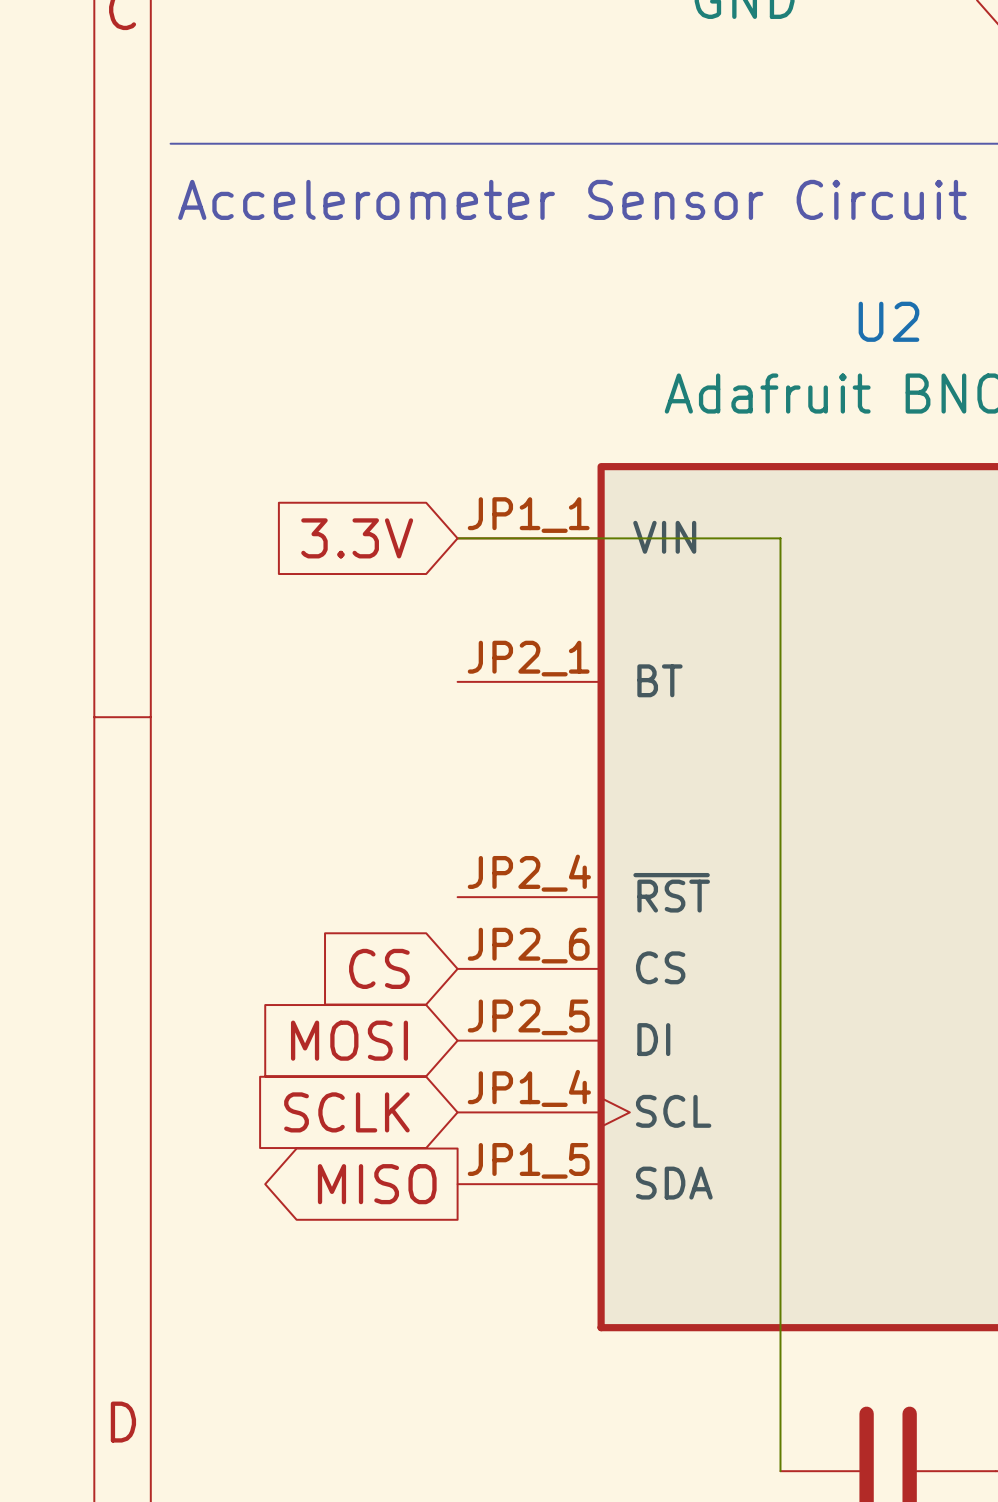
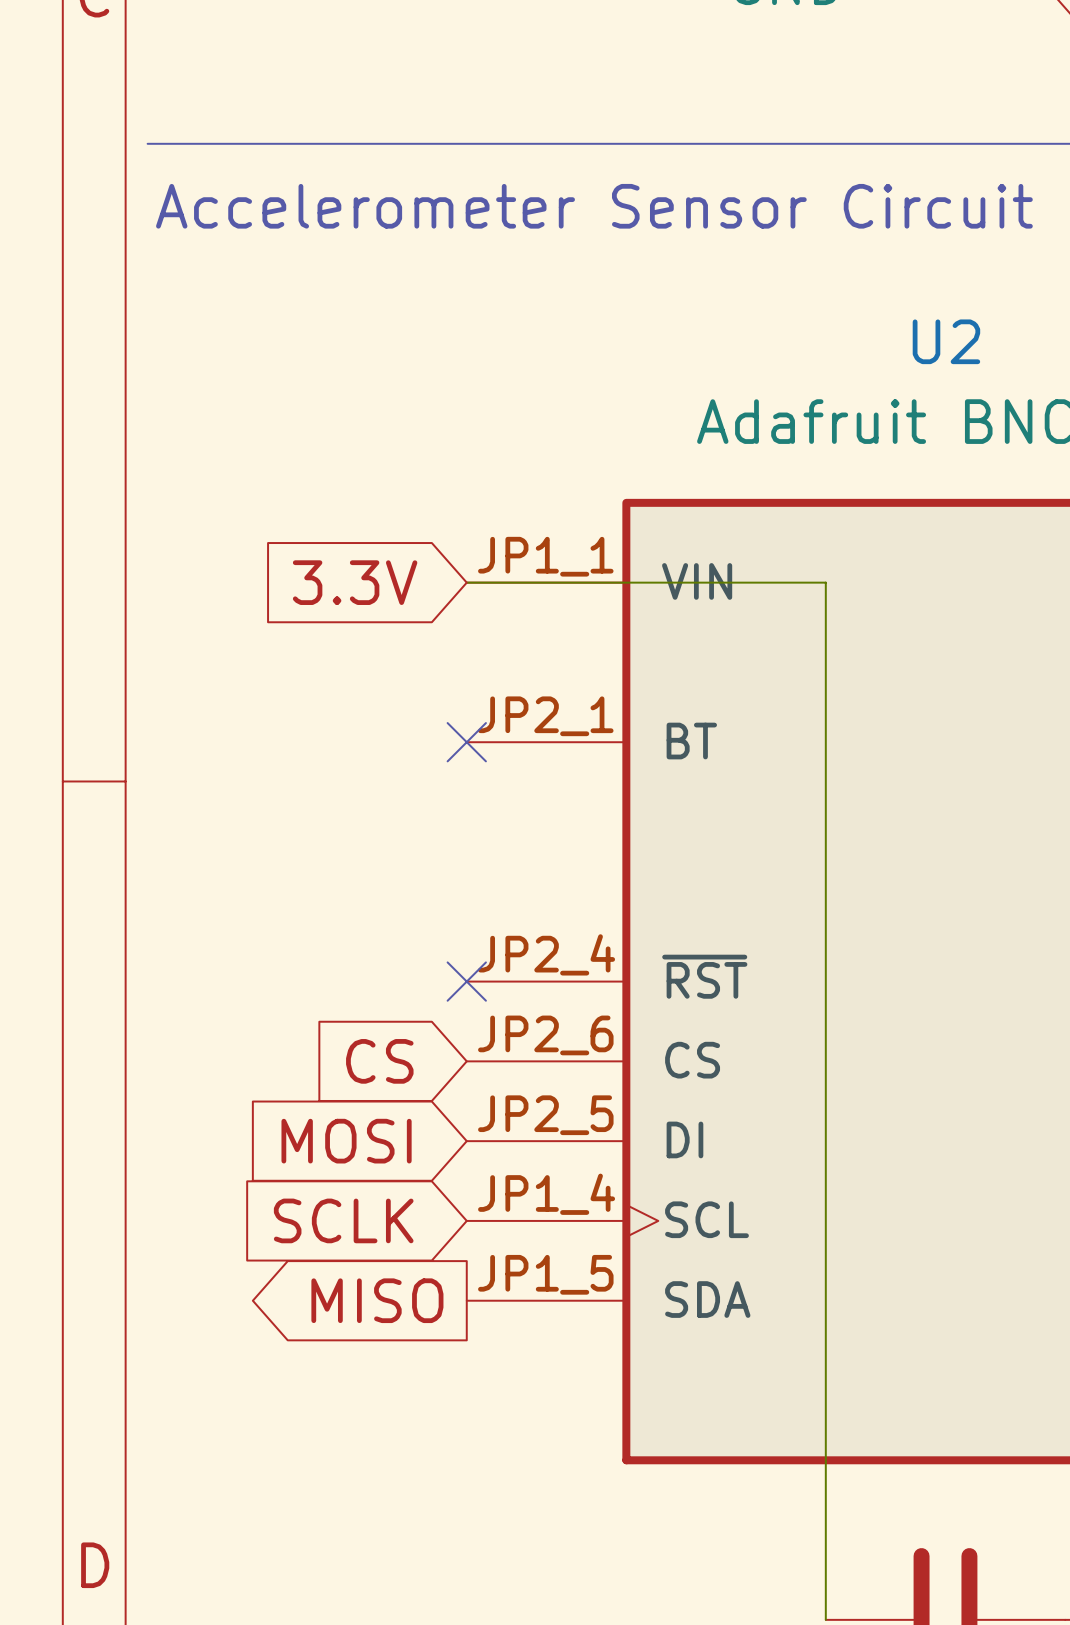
no-connect mark: none -> (466, 742)
no-connect mark: none -> (466, 981)

